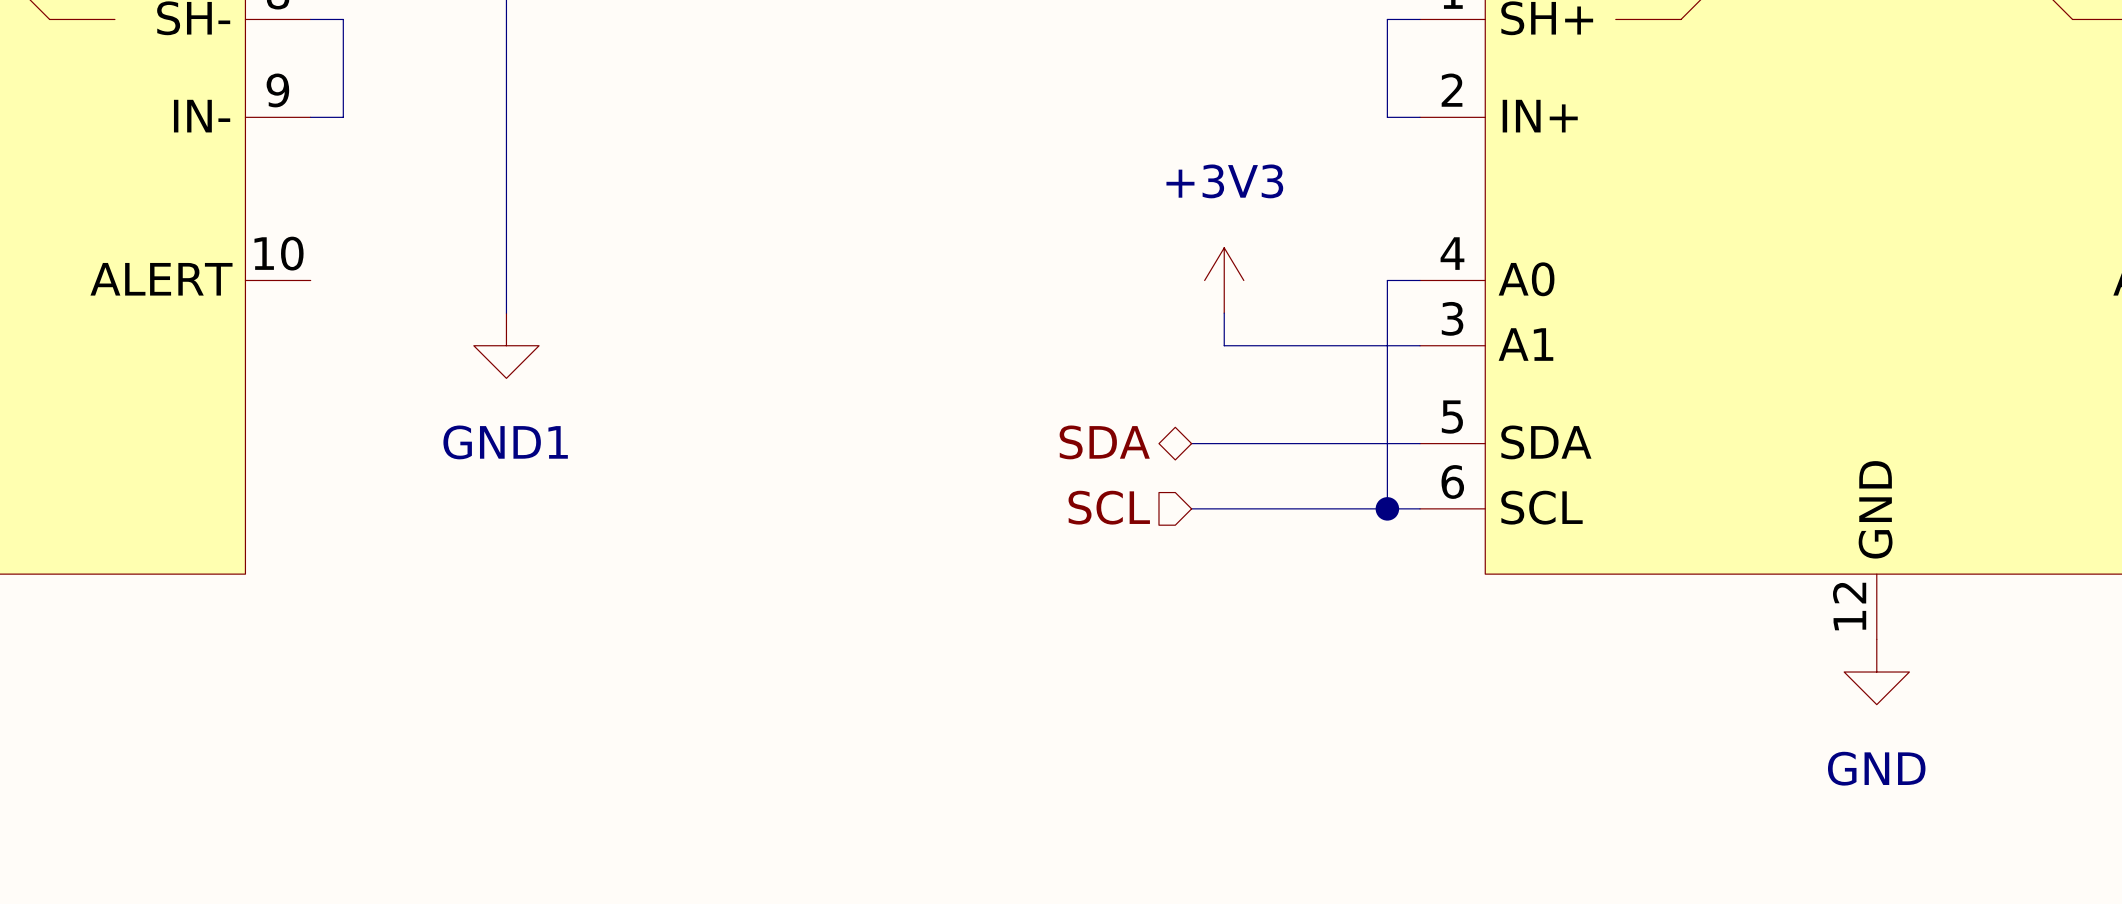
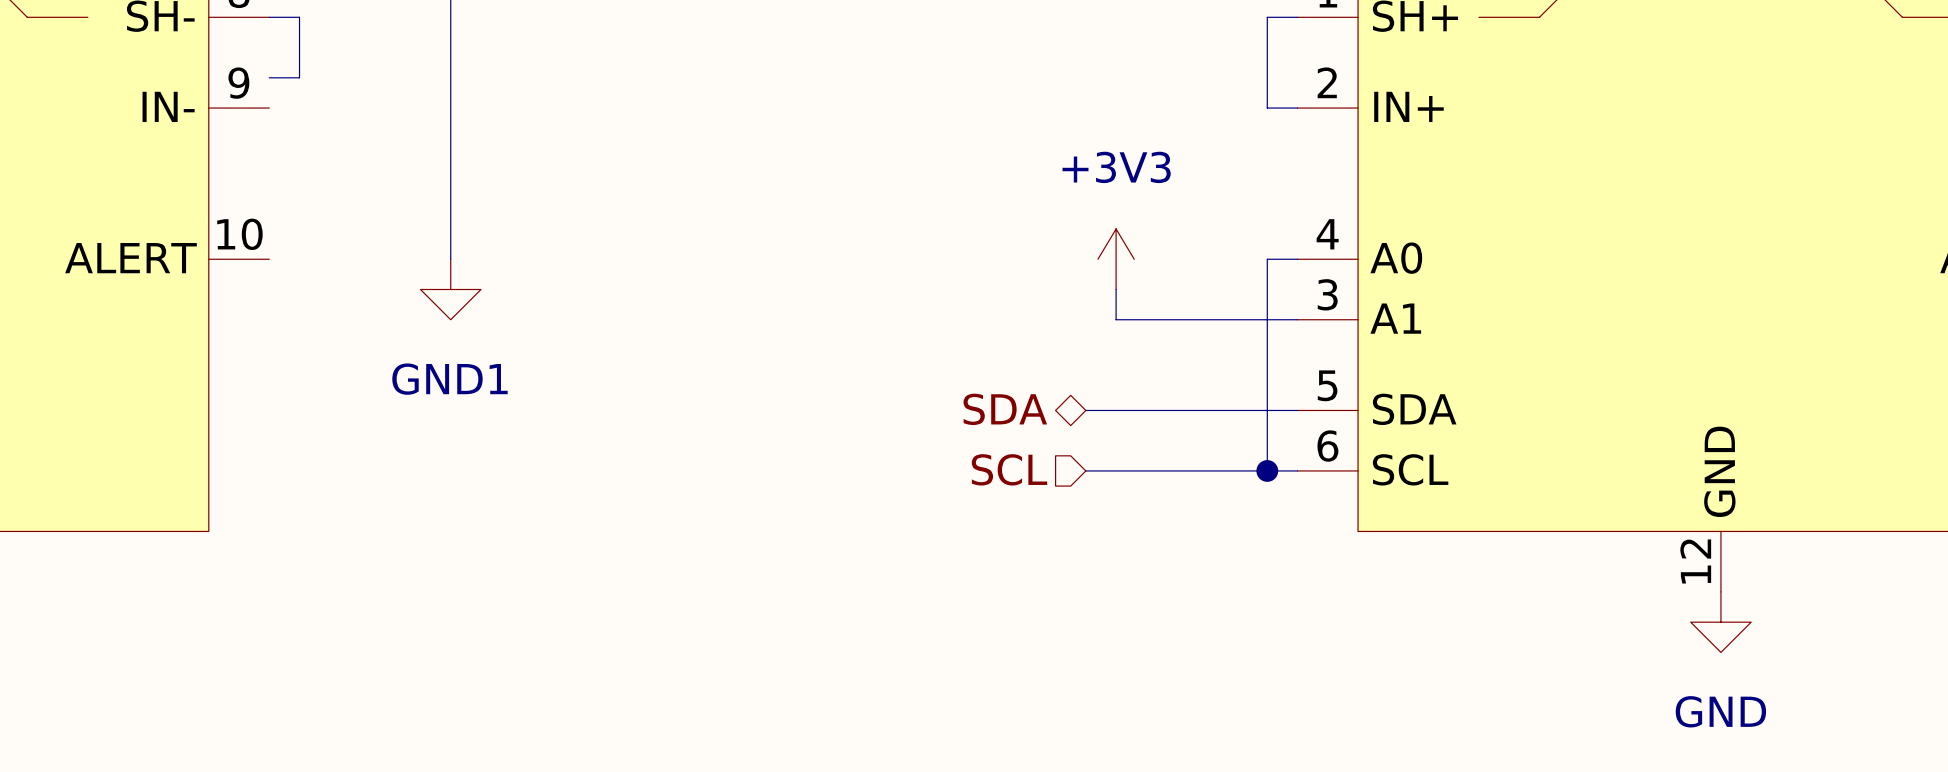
wire: (343, 84) (343, 117) (310, 117) -> (299, 77) (269, 77)
power symbol position: GND1 (506, 345) -> GND1 (450, 289)

